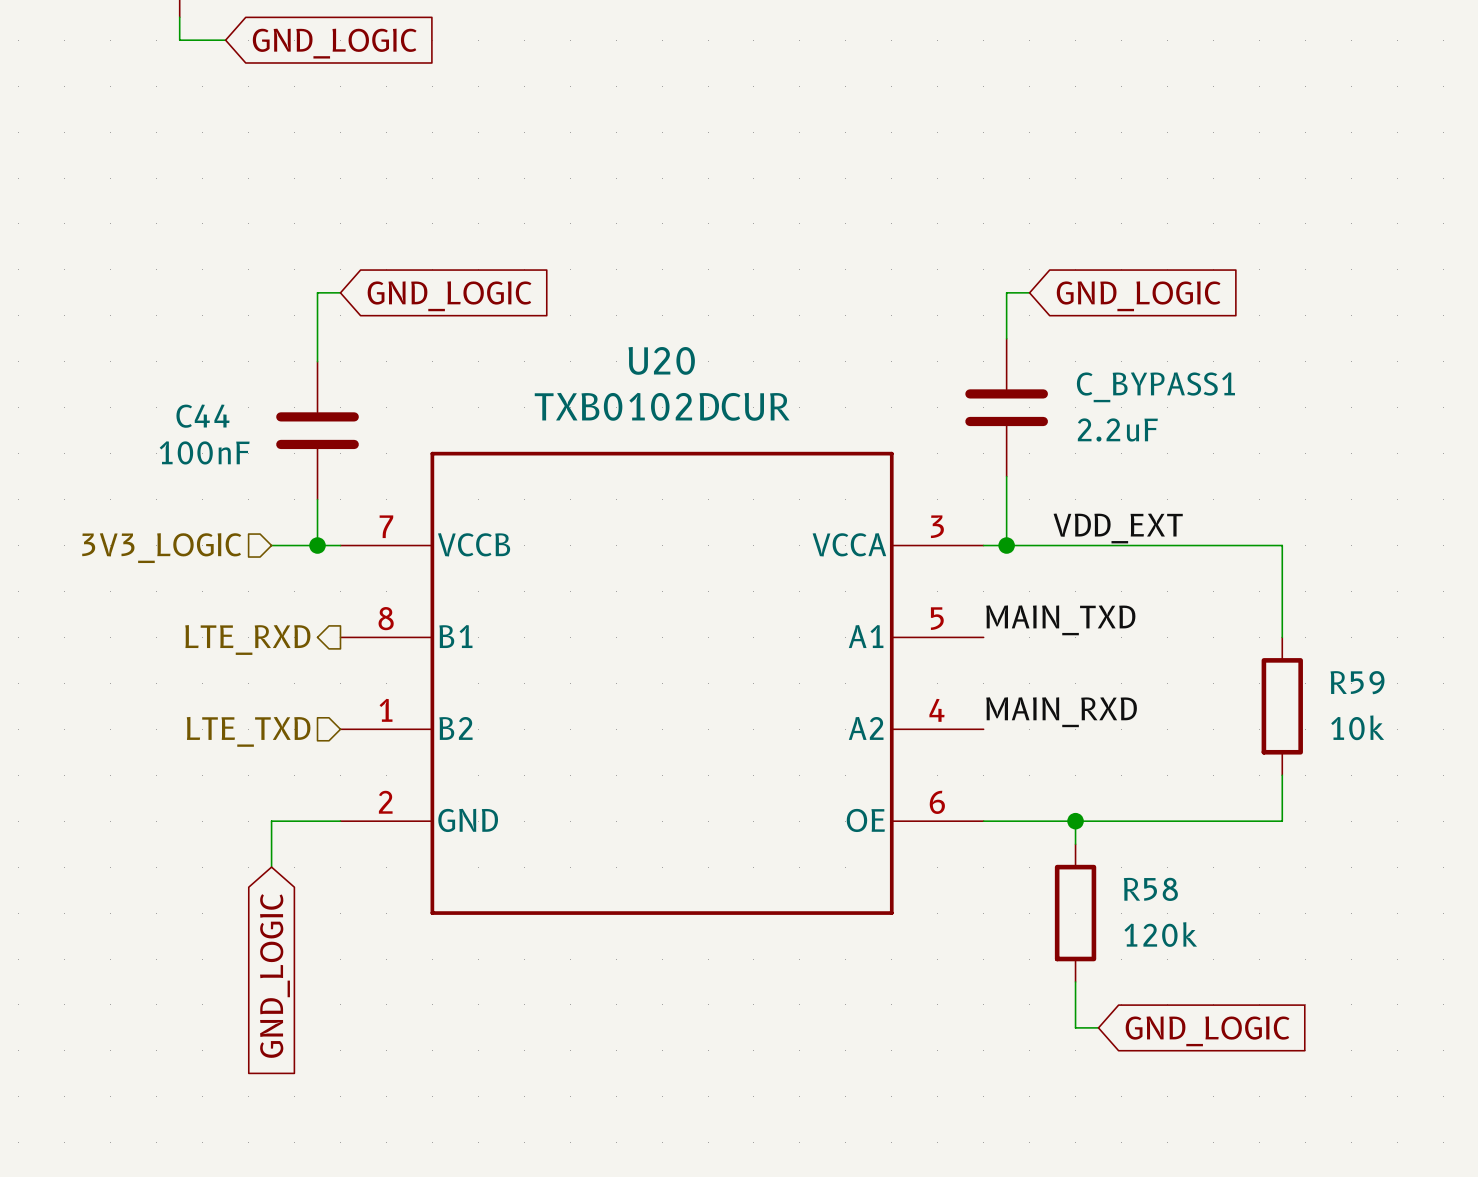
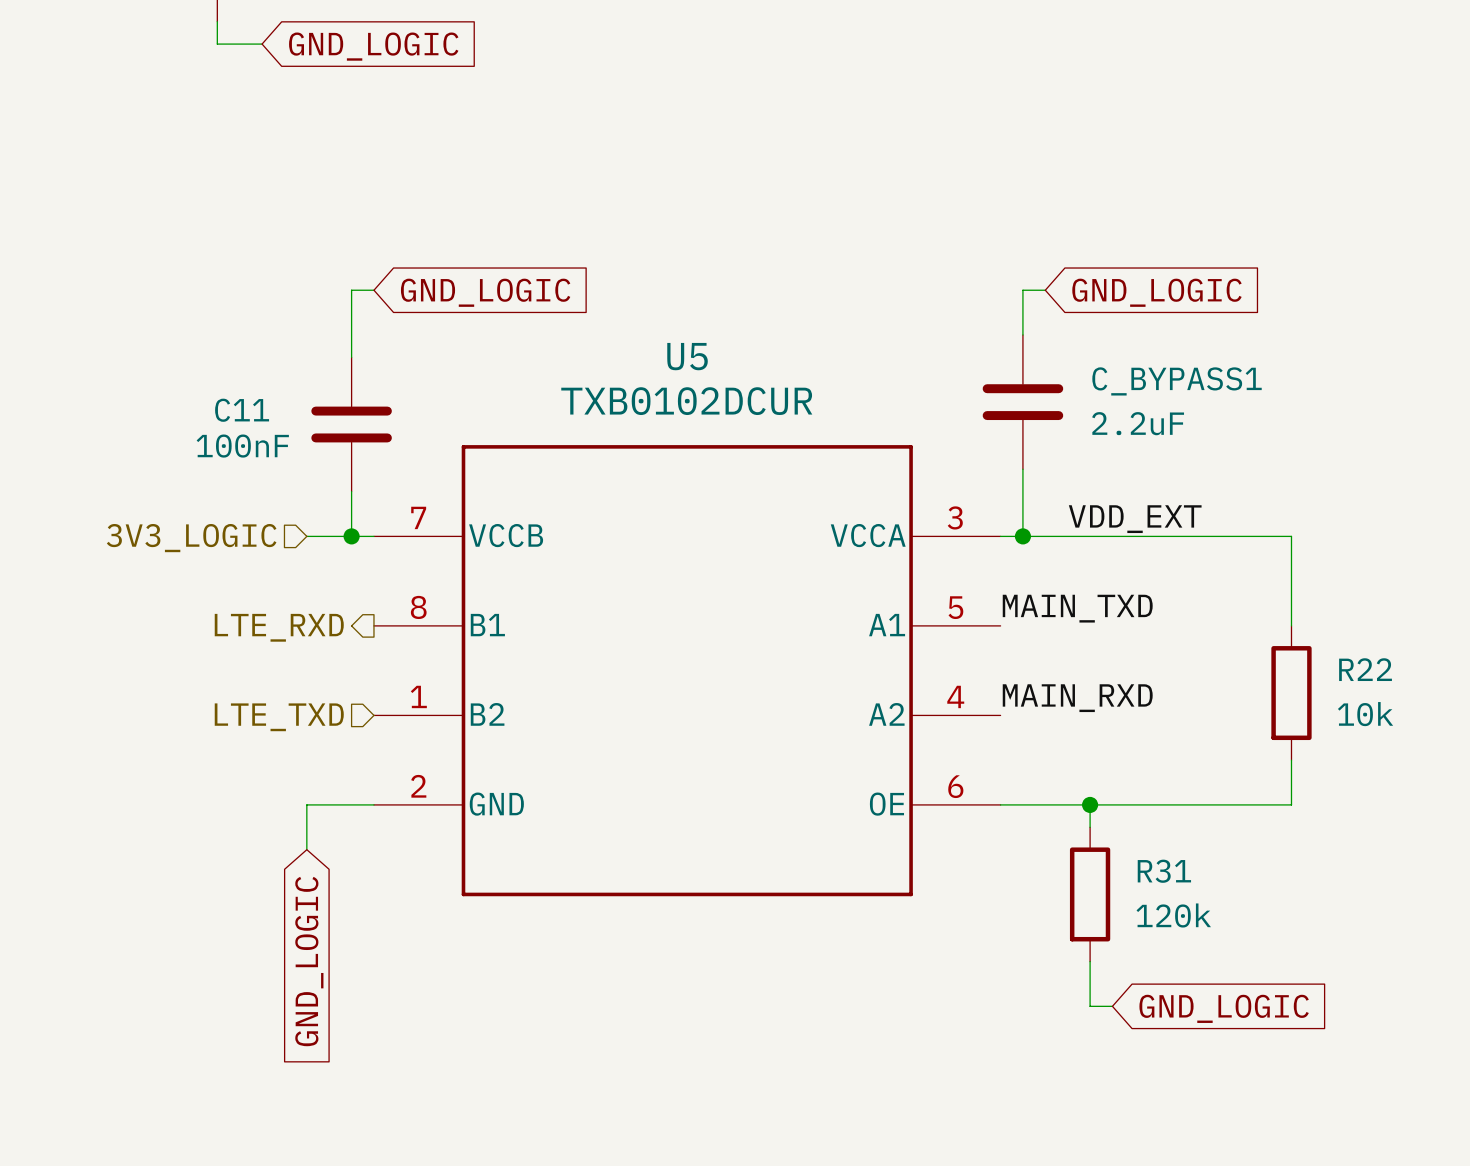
U20 name: U20 (661, 360) -> U5 (687, 356)
C44 name: C44 (202, 416) -> C11 (242, 410)
R59 name: R59 (1357, 682) -> R22 (1365, 669)
R58 name: R58 (1150, 889) -> R31 (1164, 871)

